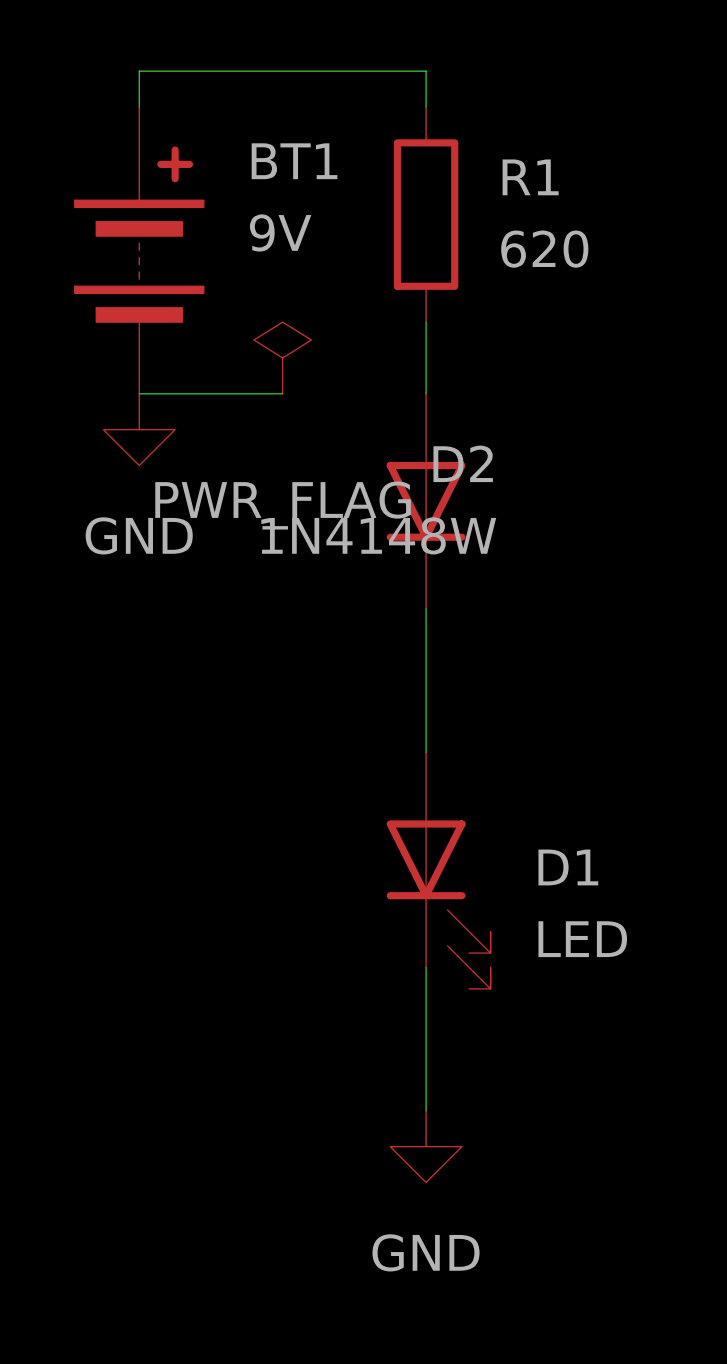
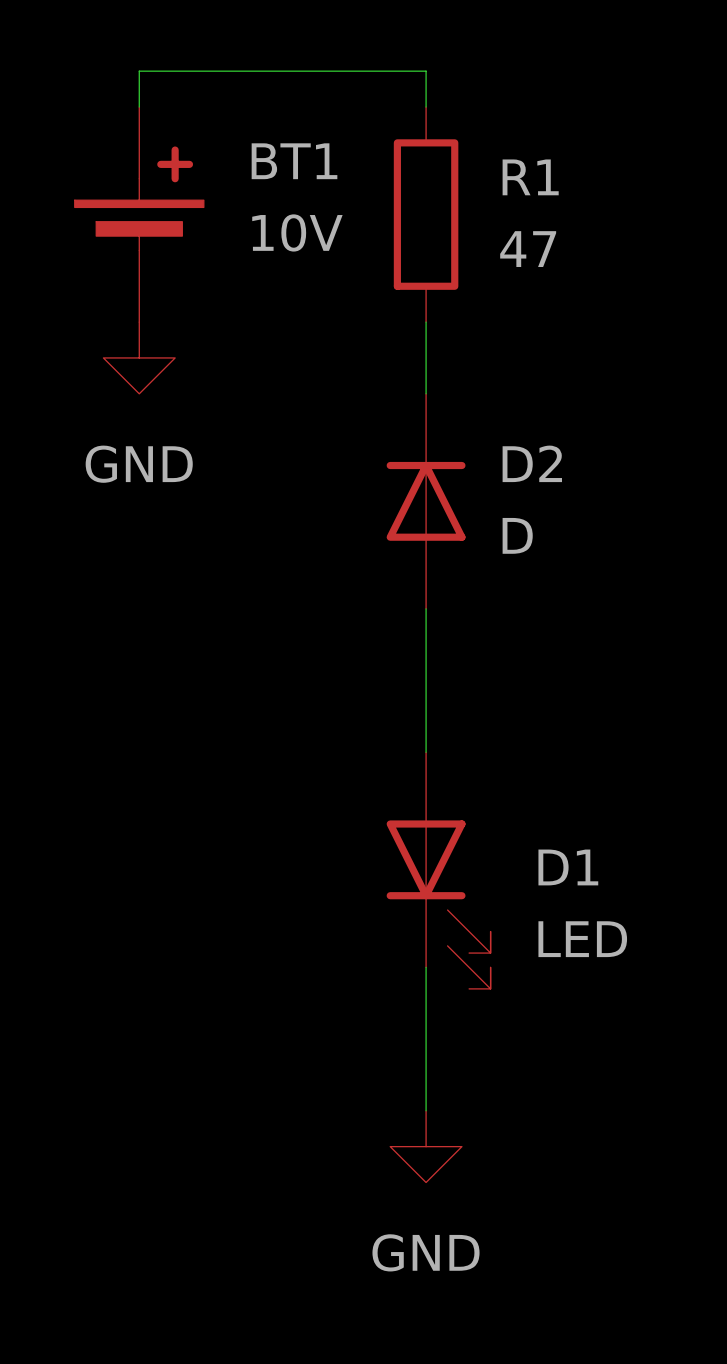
BT1 symbol: [74, 107, 204, 394] -> [74, 107, 204, 323]
BT1 value: 9V (280, 232) -> 10V (297, 232)
R1 value: 620 (544, 249) -> 47 (528, 249)
power symbol: PWR_FLAG (282, 357) -> none
wire: (139, 393) (282, 393) -> none
power symbol position: GND (139, 429) -> GND (139, 357)
D2 name position: D2 (463, 463) -> D2 (532, 463)
D2 rotation: 0° (426, 501) -> 180° (426, 501)
D2 value: 1N4148W (378, 535) -> D (517, 535)

